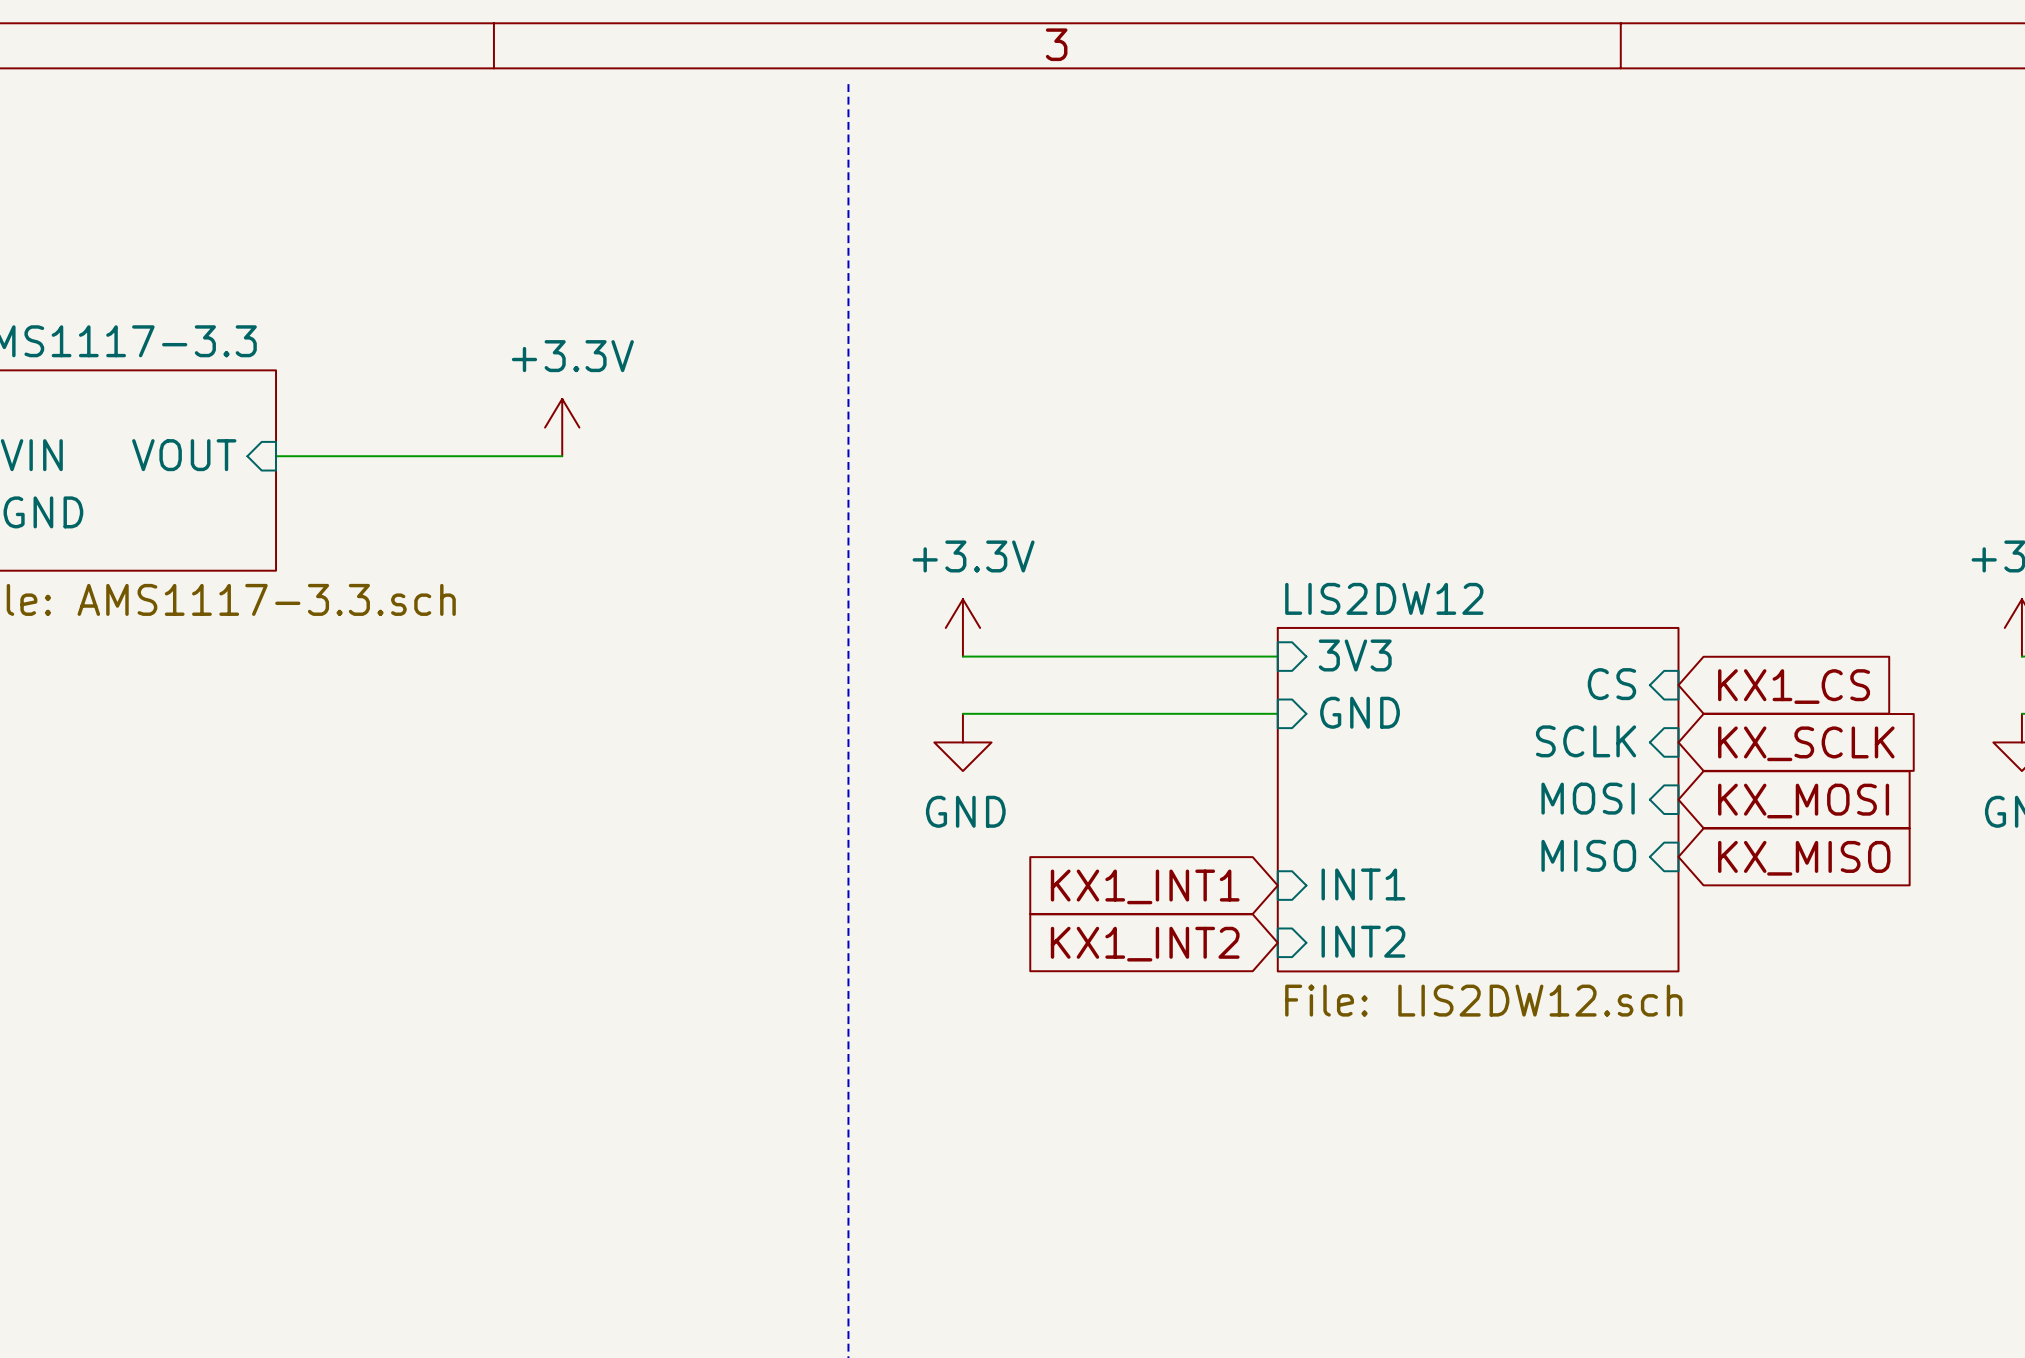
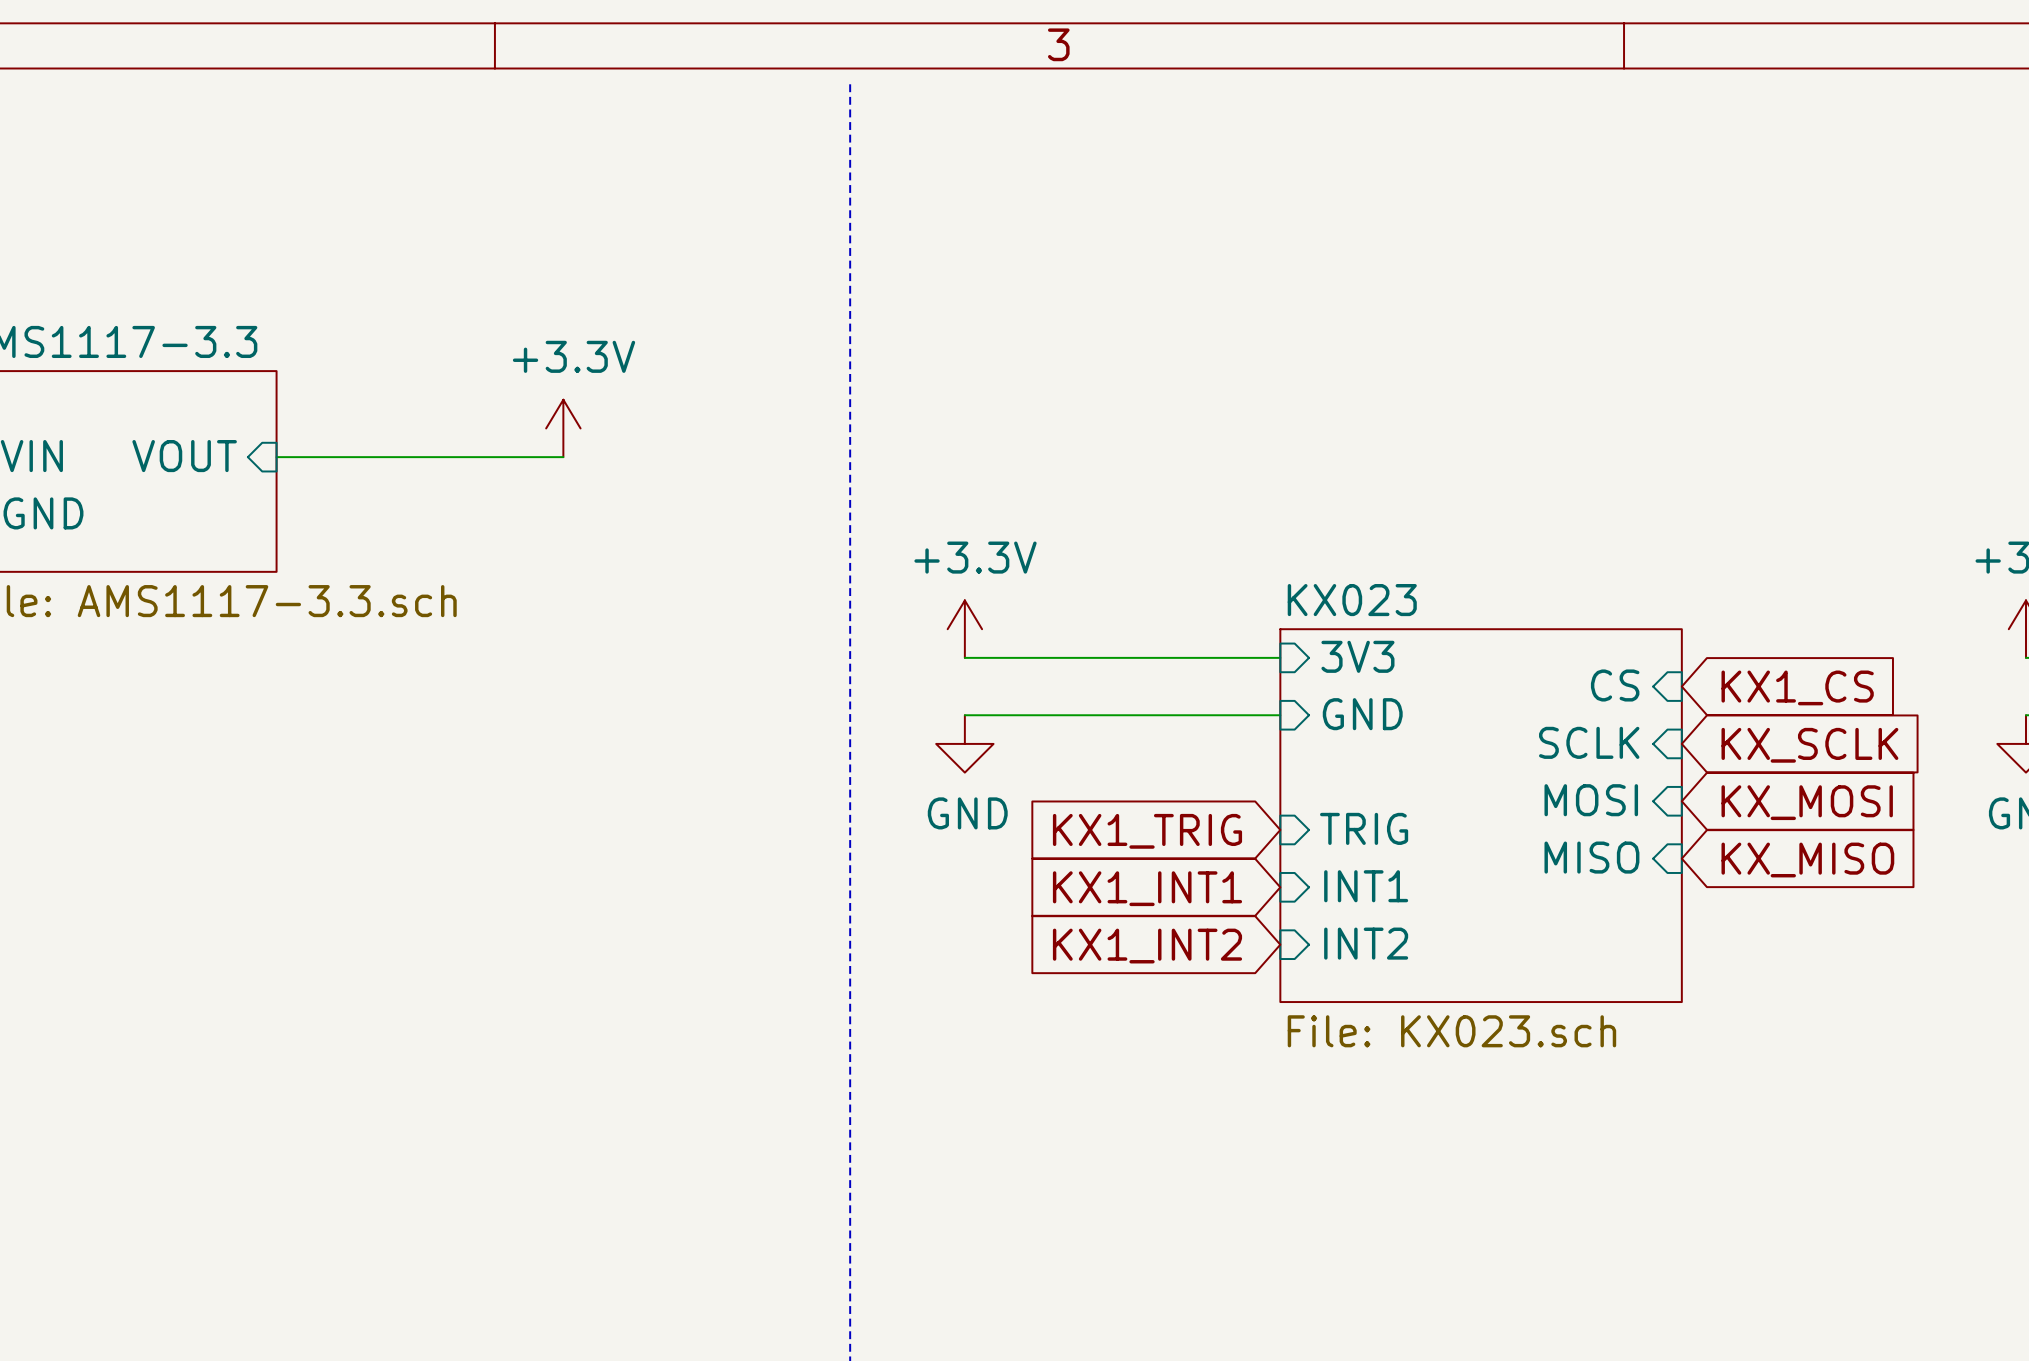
sheet LIS2DW12: File: LIS2DW12.sch (1478, 799) -> none
sheet KX023: none -> File: KX023.sch (1481, 815)
sheet pin: none -> TRIG (1364, 828)
global label: none -> KX1_TRIG (1147, 831)

